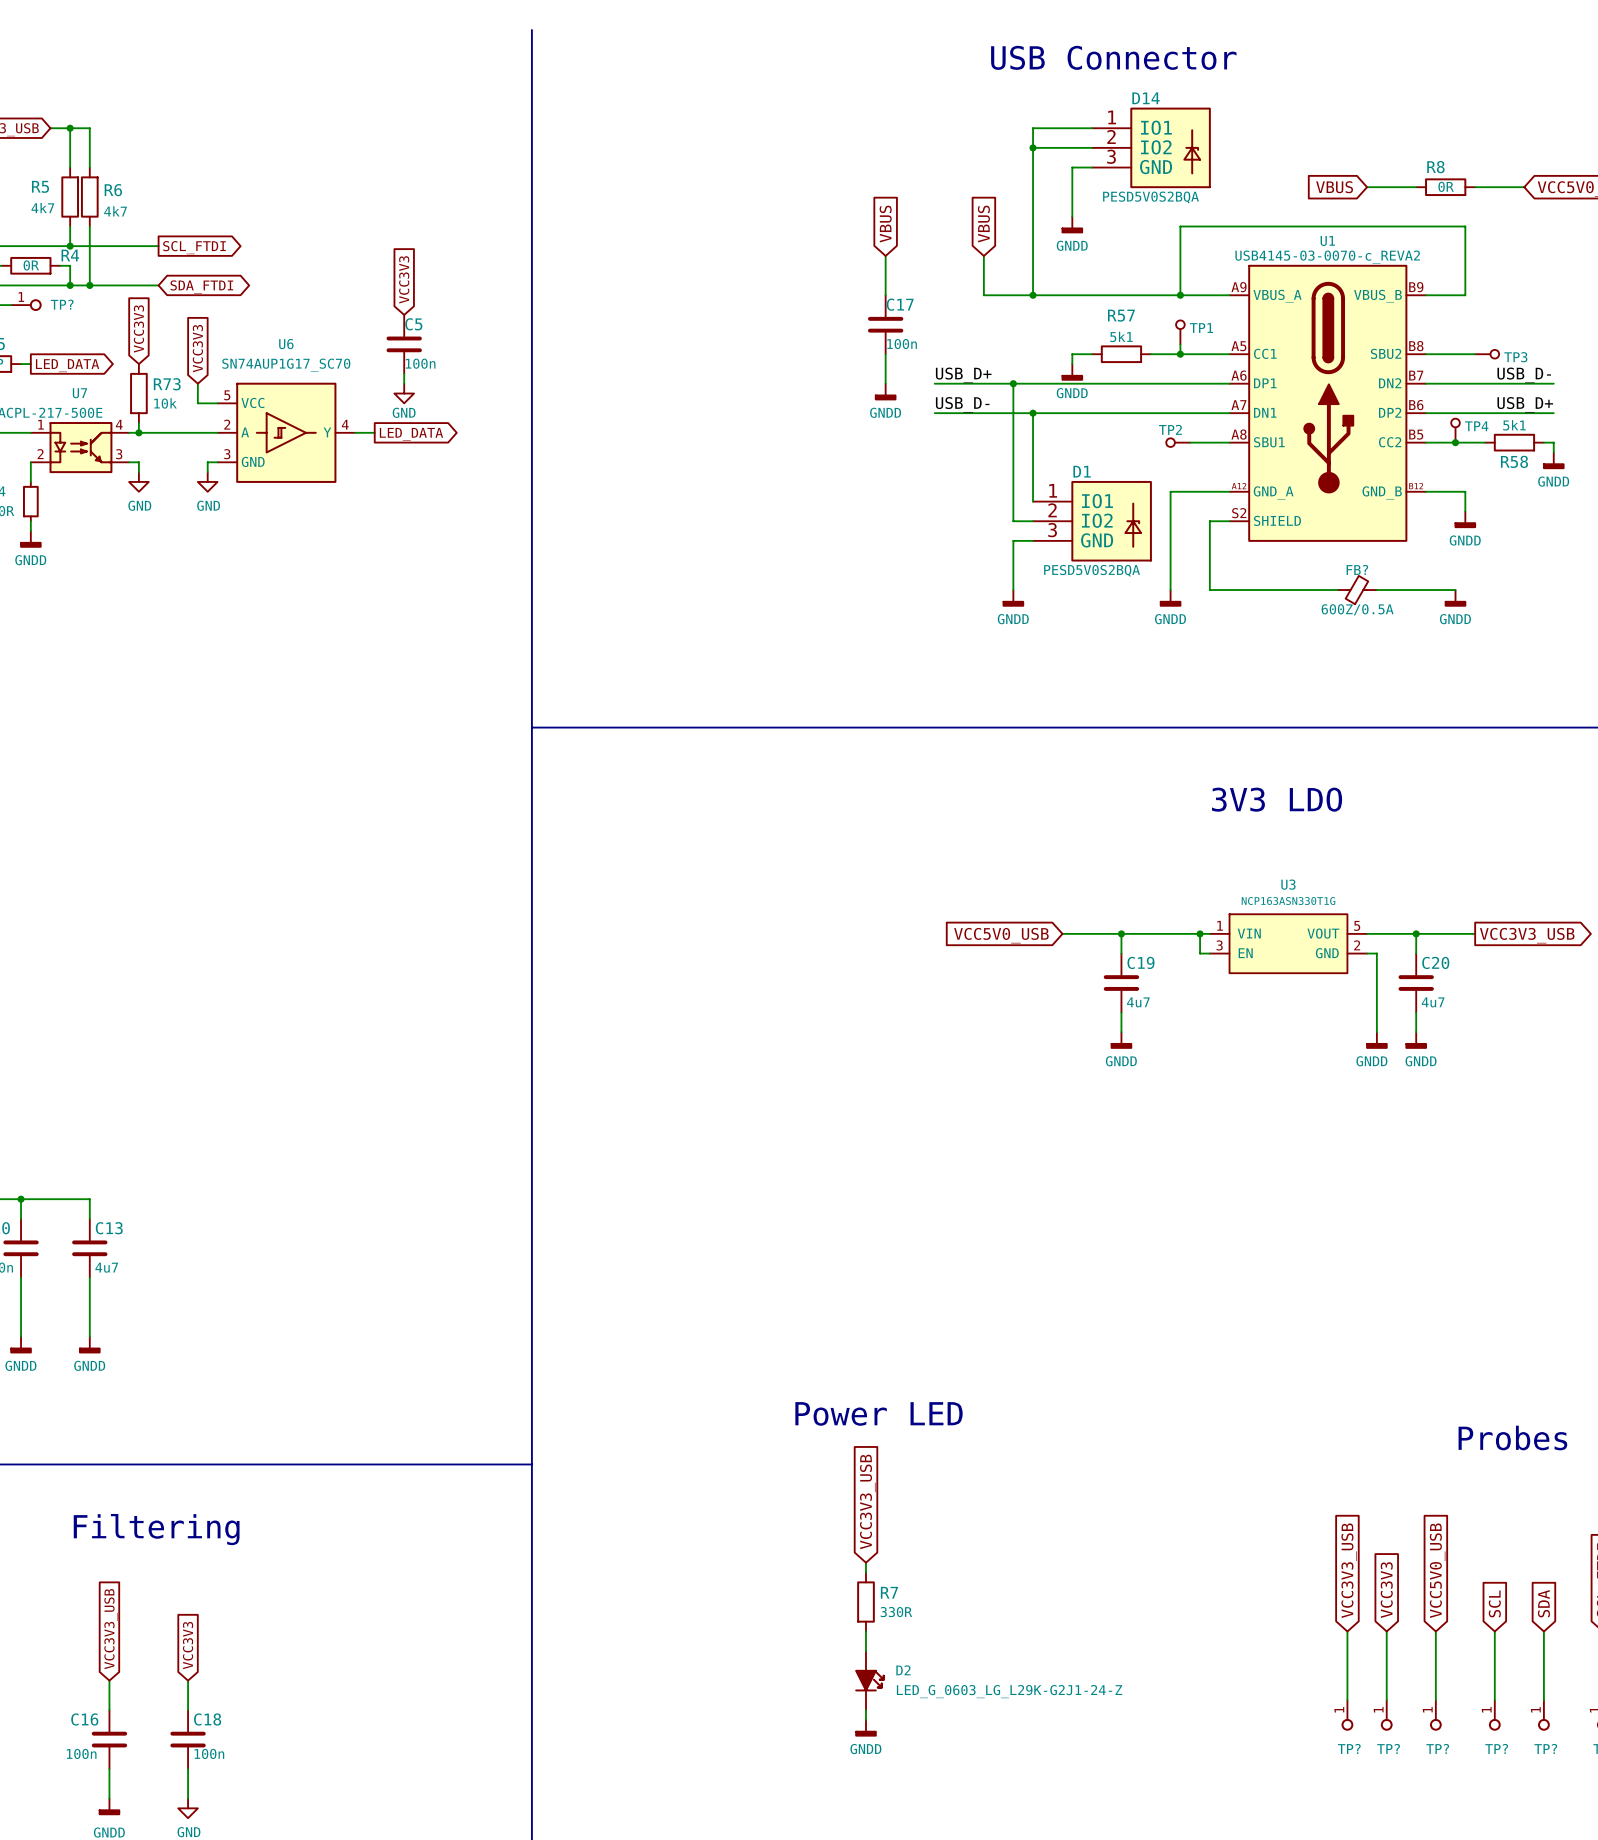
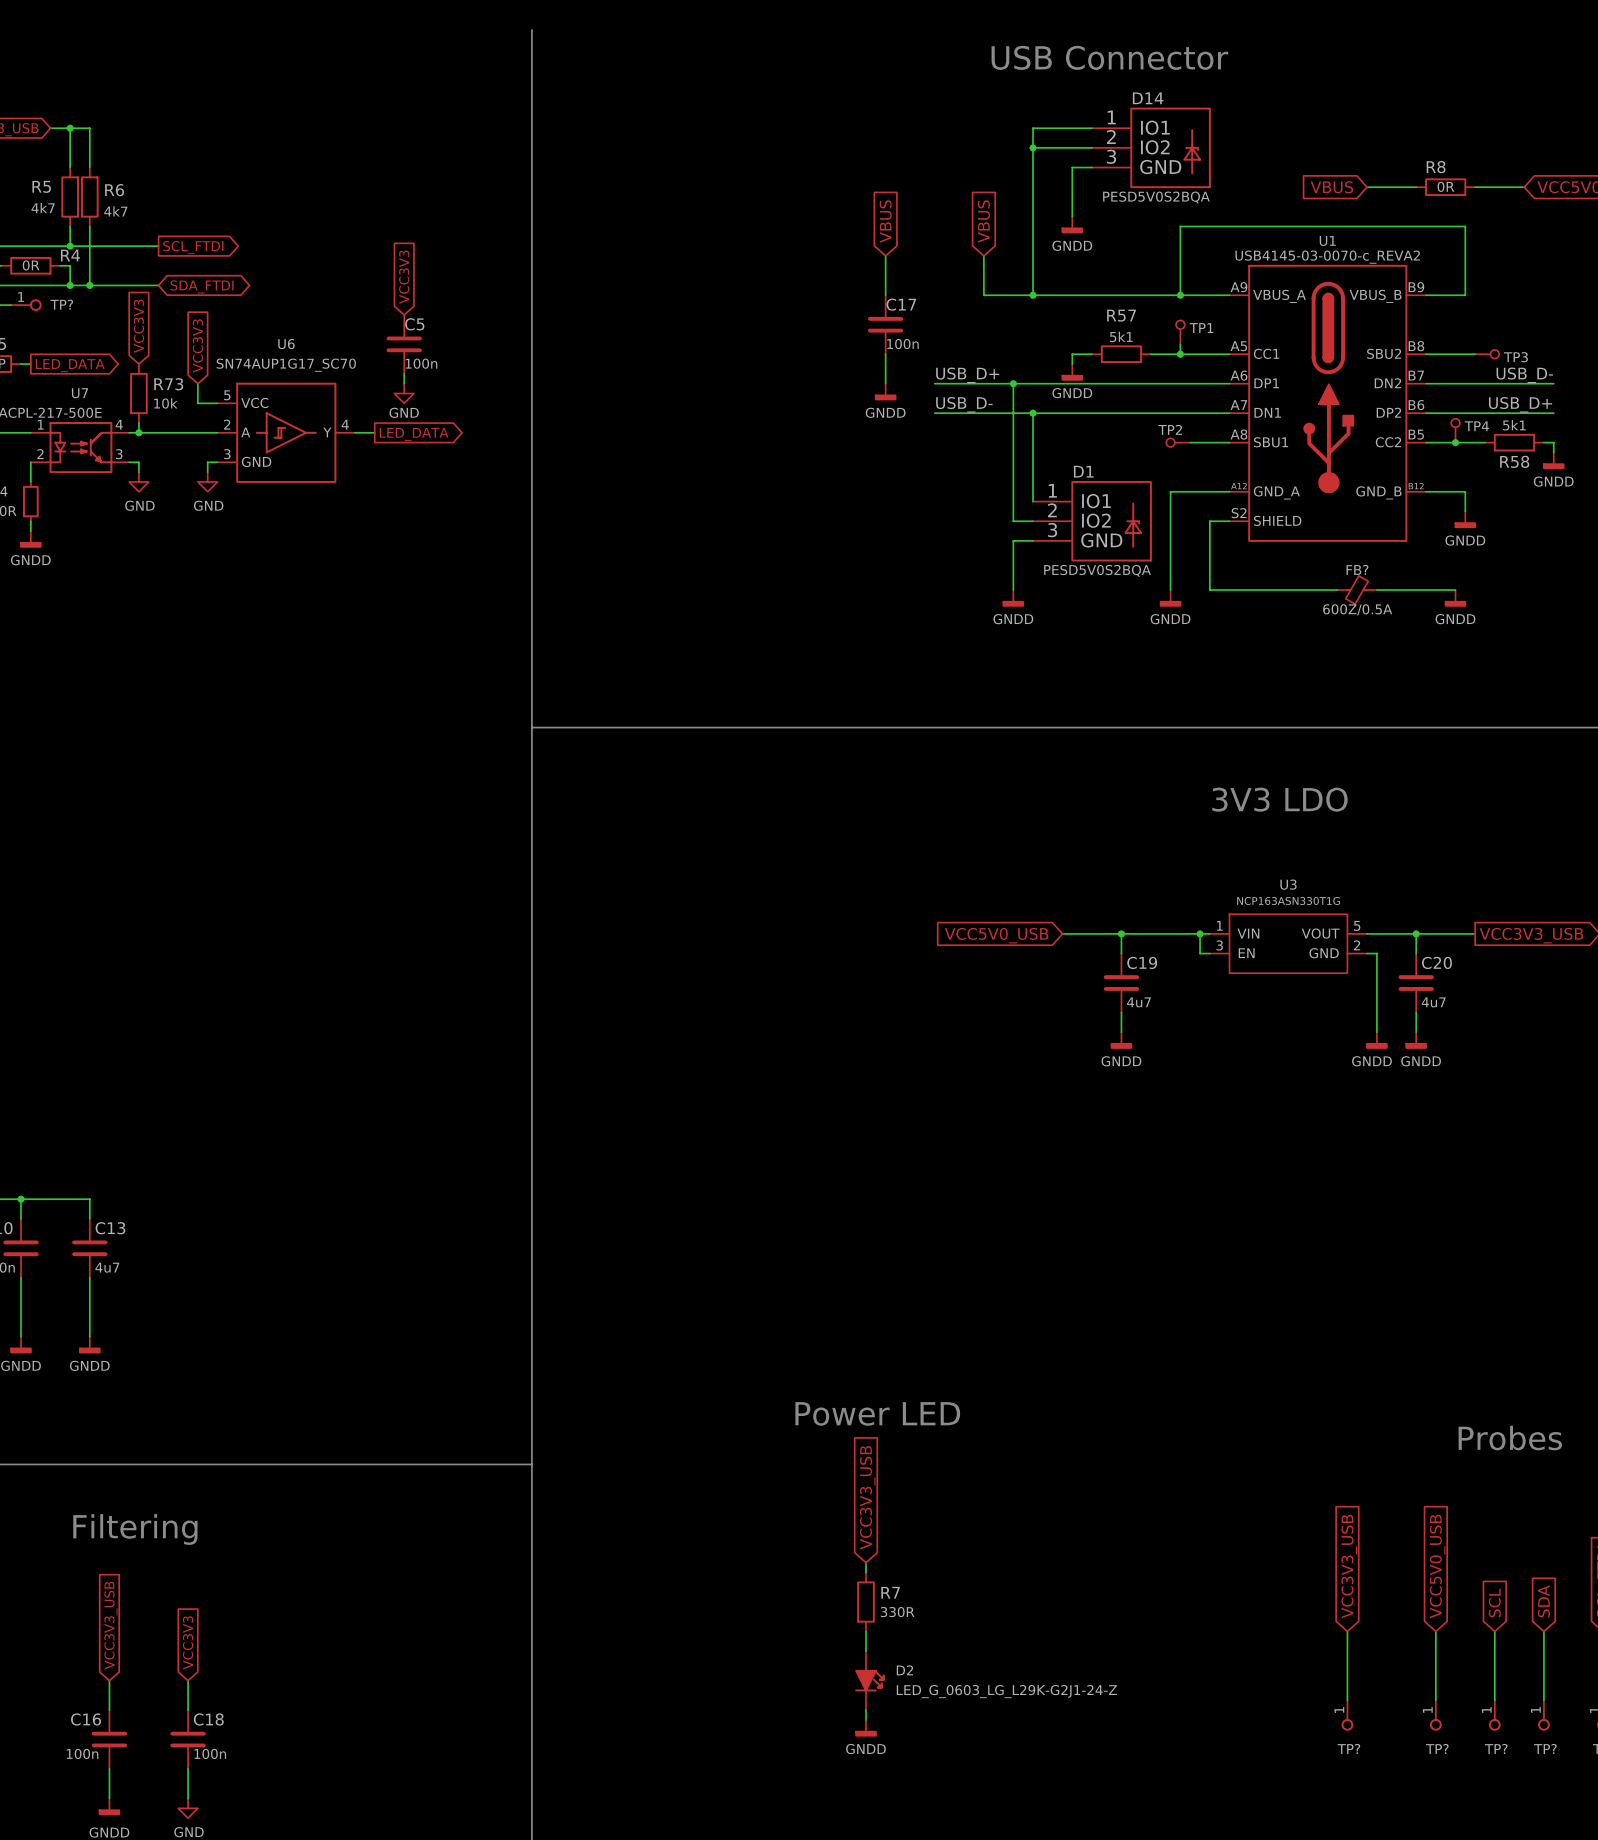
global label: VCC3V3 (1386, 1590) -> none
wire: (1386, 1631) (1386, 1700) -> none
TP?: (1386, 1715) -> none

